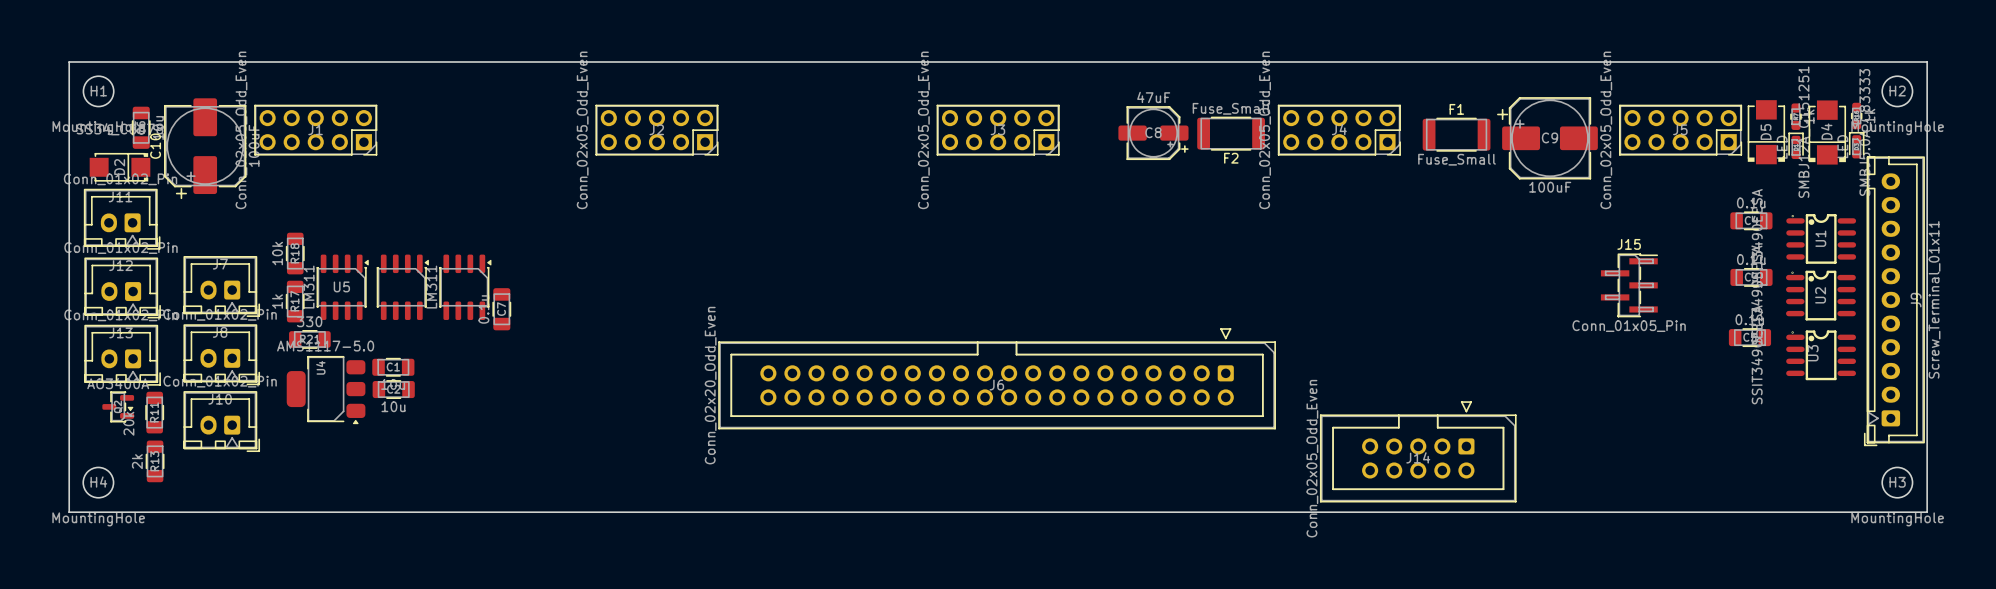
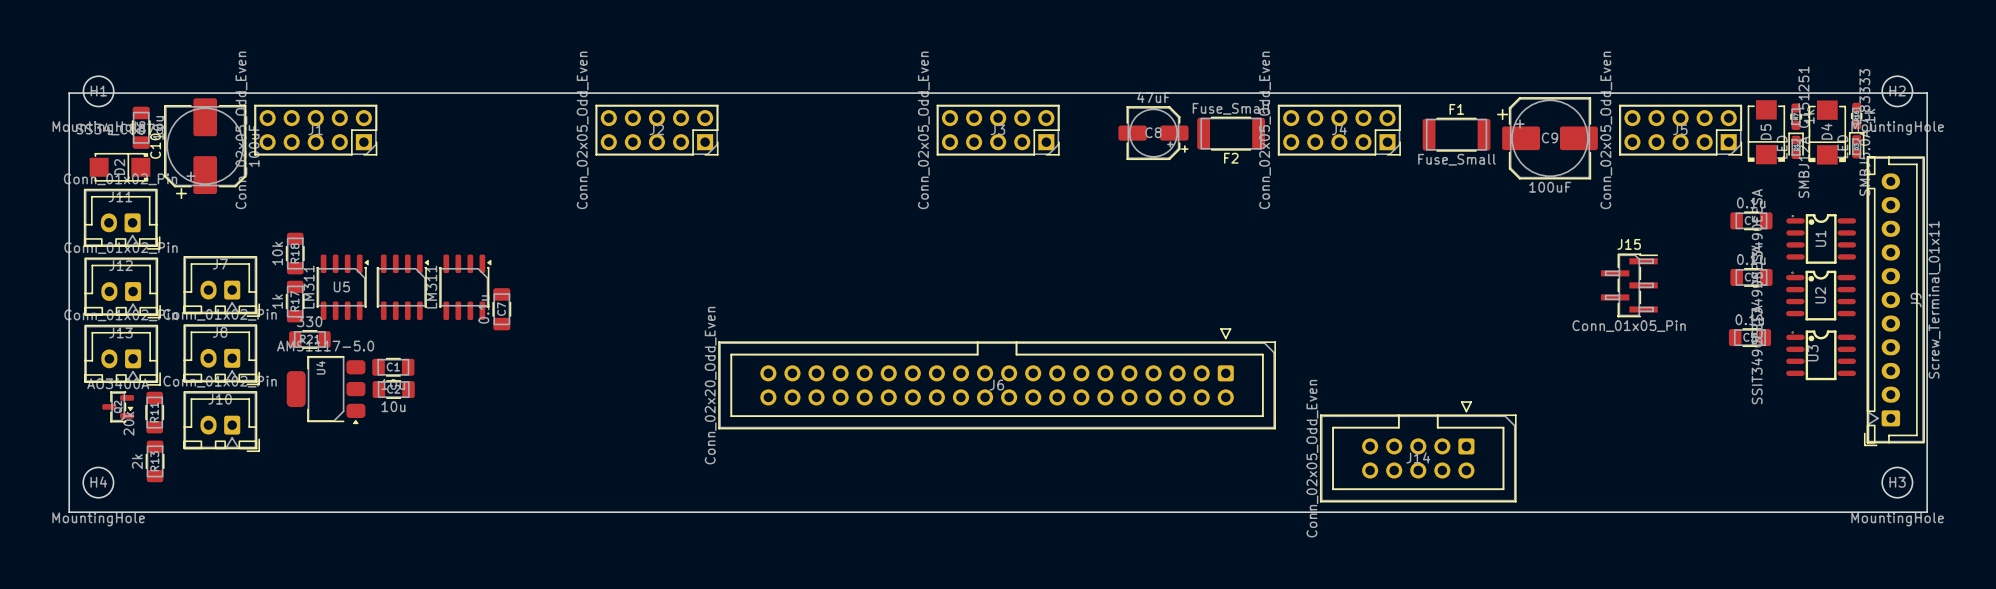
board edge: (69, 93) (69, 61) (1927, 61) (1927, 93) -> (69, 93) (1927, 93)

